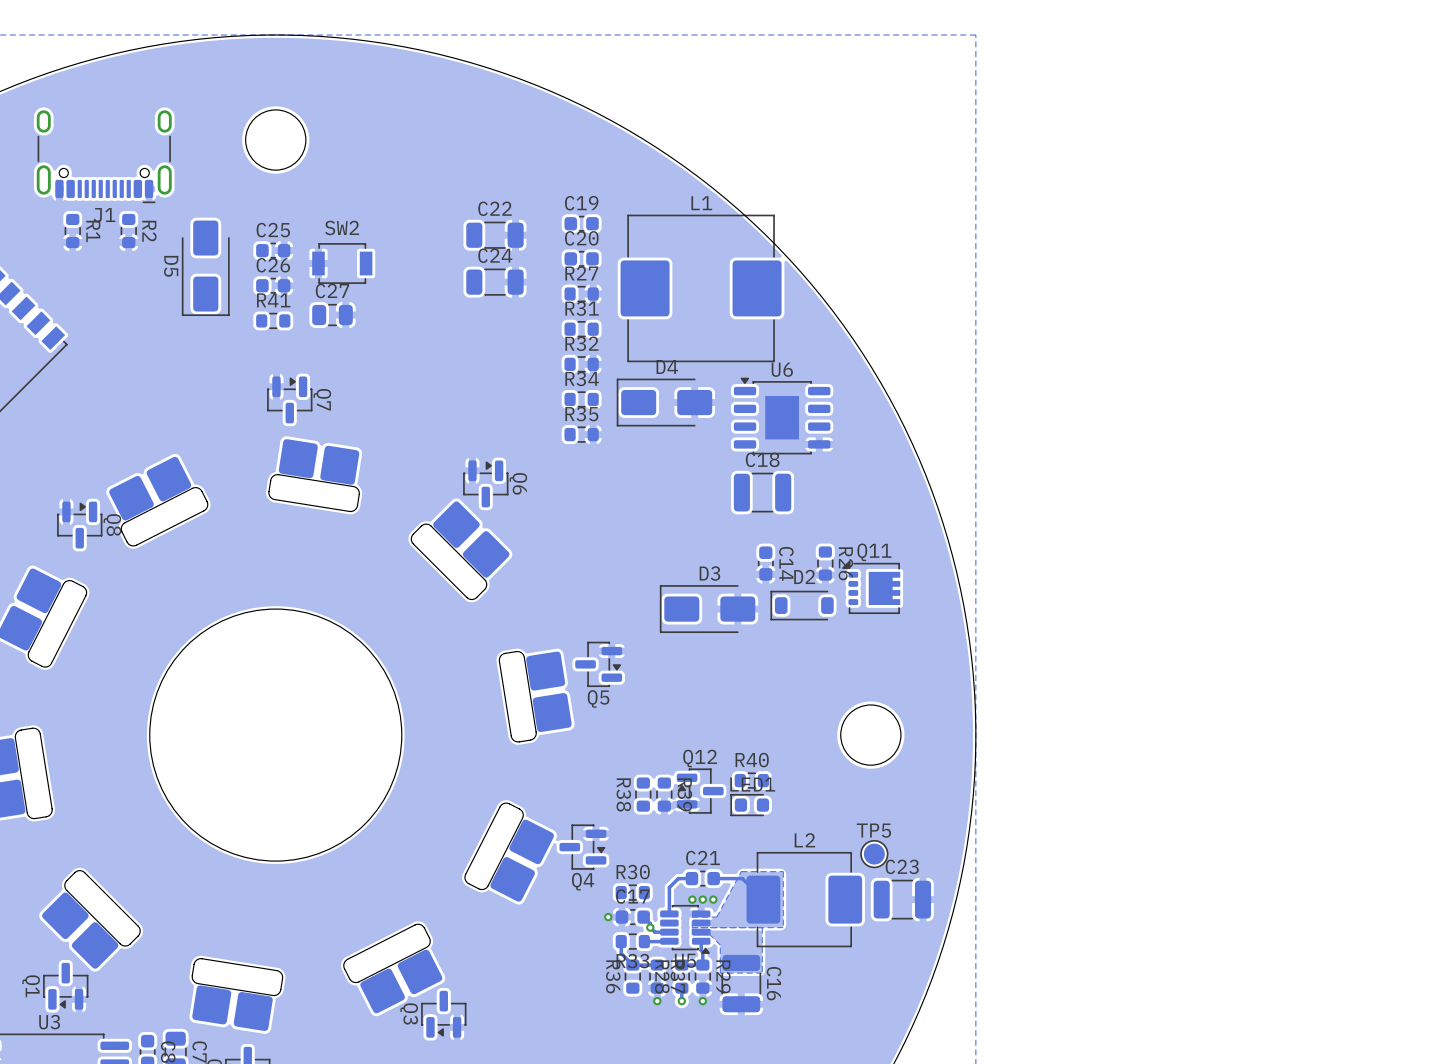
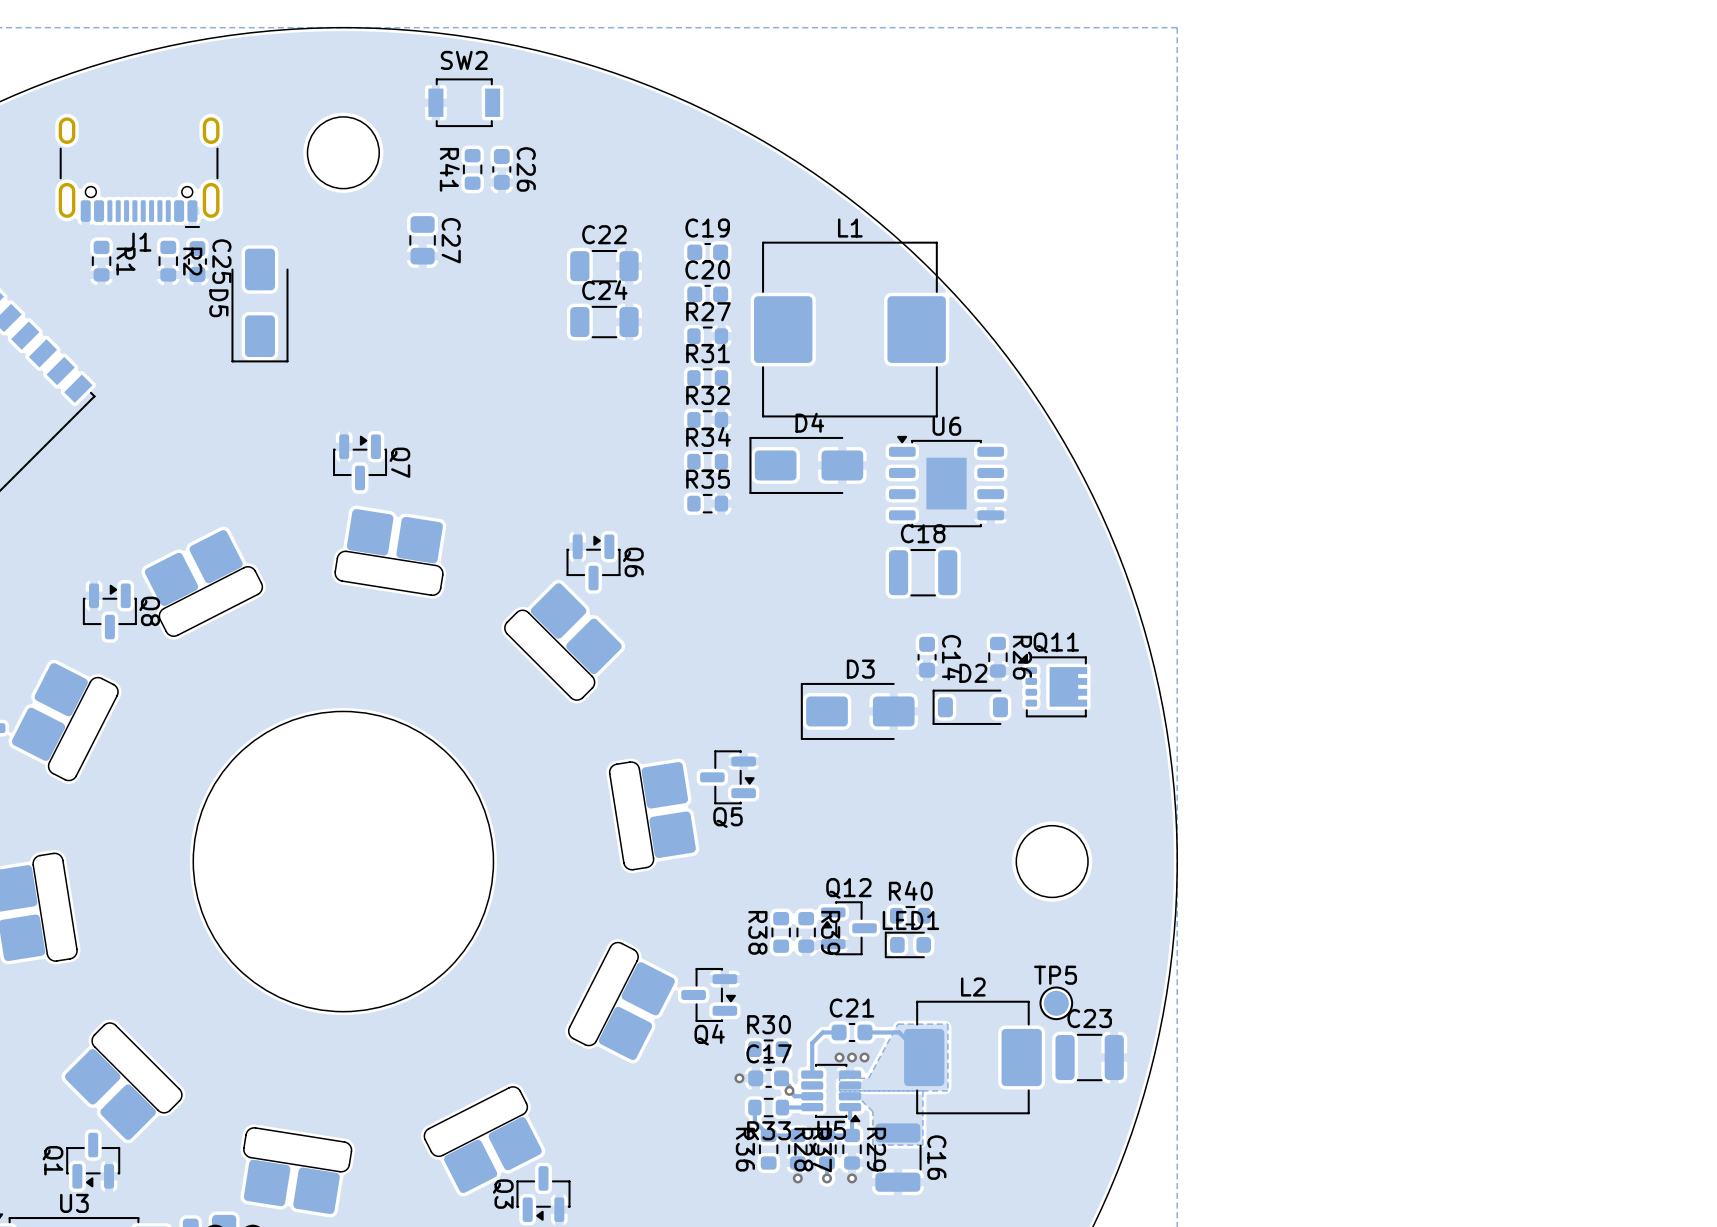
C25 rotation: 0° (273, 250) -> 90° clockwise (197, 261)
C25 position: (273, 250) -> (197, 261)
SW2 position: (342, 263) -> (464, 102)
C26 rotation: 0° (273, 285) -> 90° clockwise (501, 169)
C26 position: (273, 285) -> (501, 169)
R41 name position: R41 (273, 300) -> R41 (449, 169)
C27 rotation: 0° (332, 315) -> 90° clockwise (422, 240)
C27 position: (332, 315) -> (422, 240)
R41 rotation: 0° (273, 320) -> 90° clockwise (472, 169)
R41 position: (273, 320) -> (472, 169)

